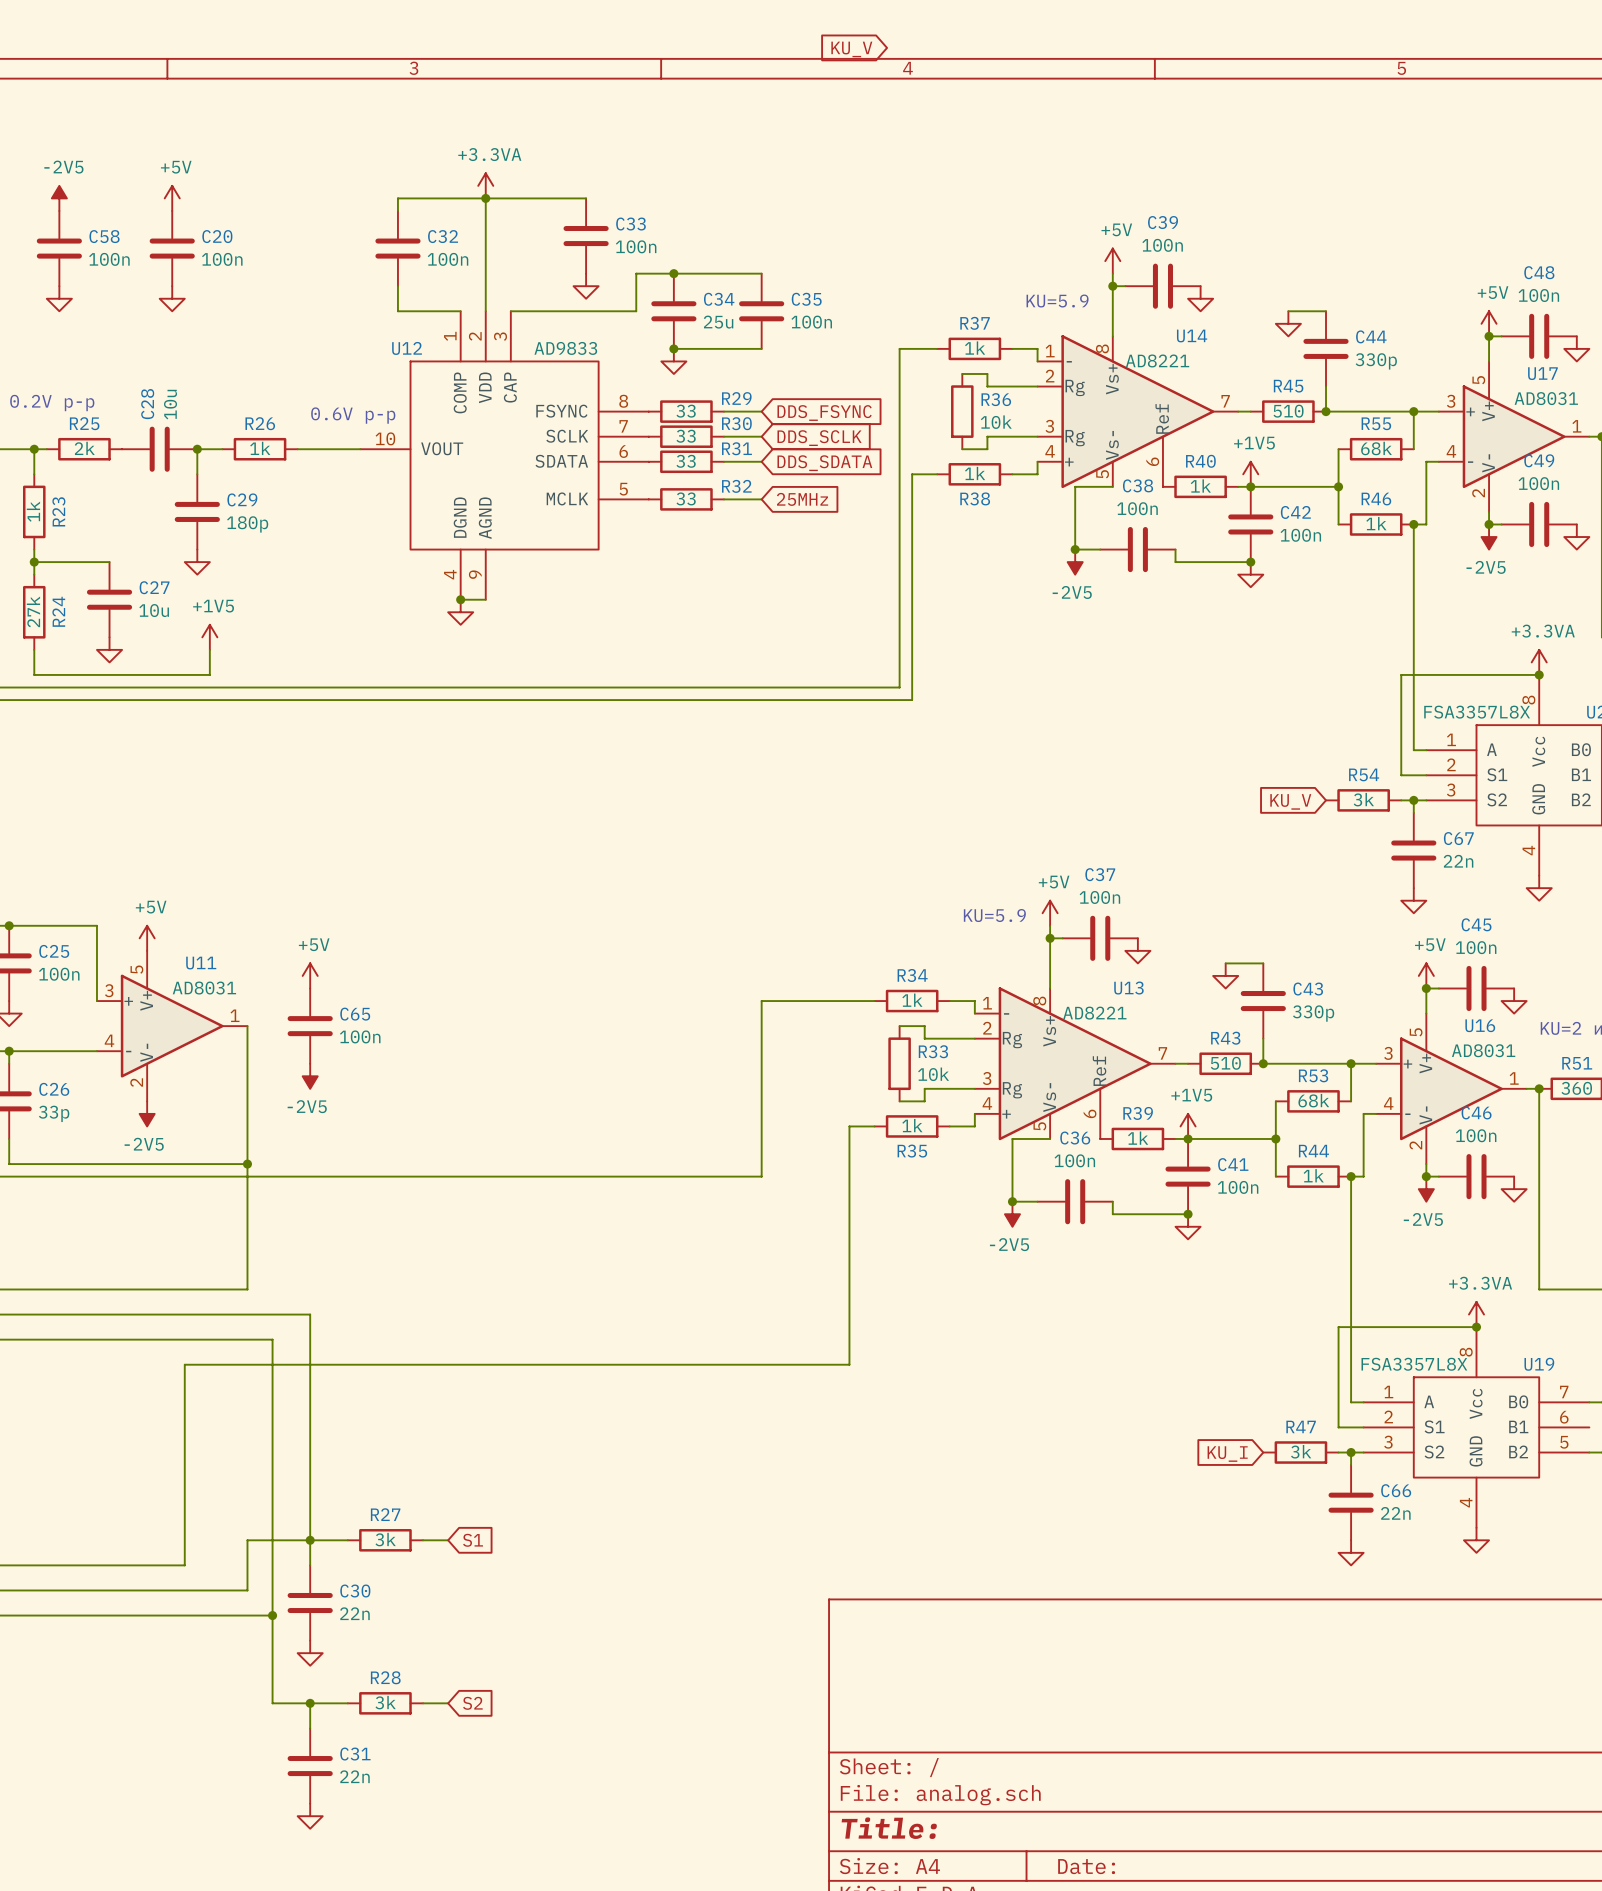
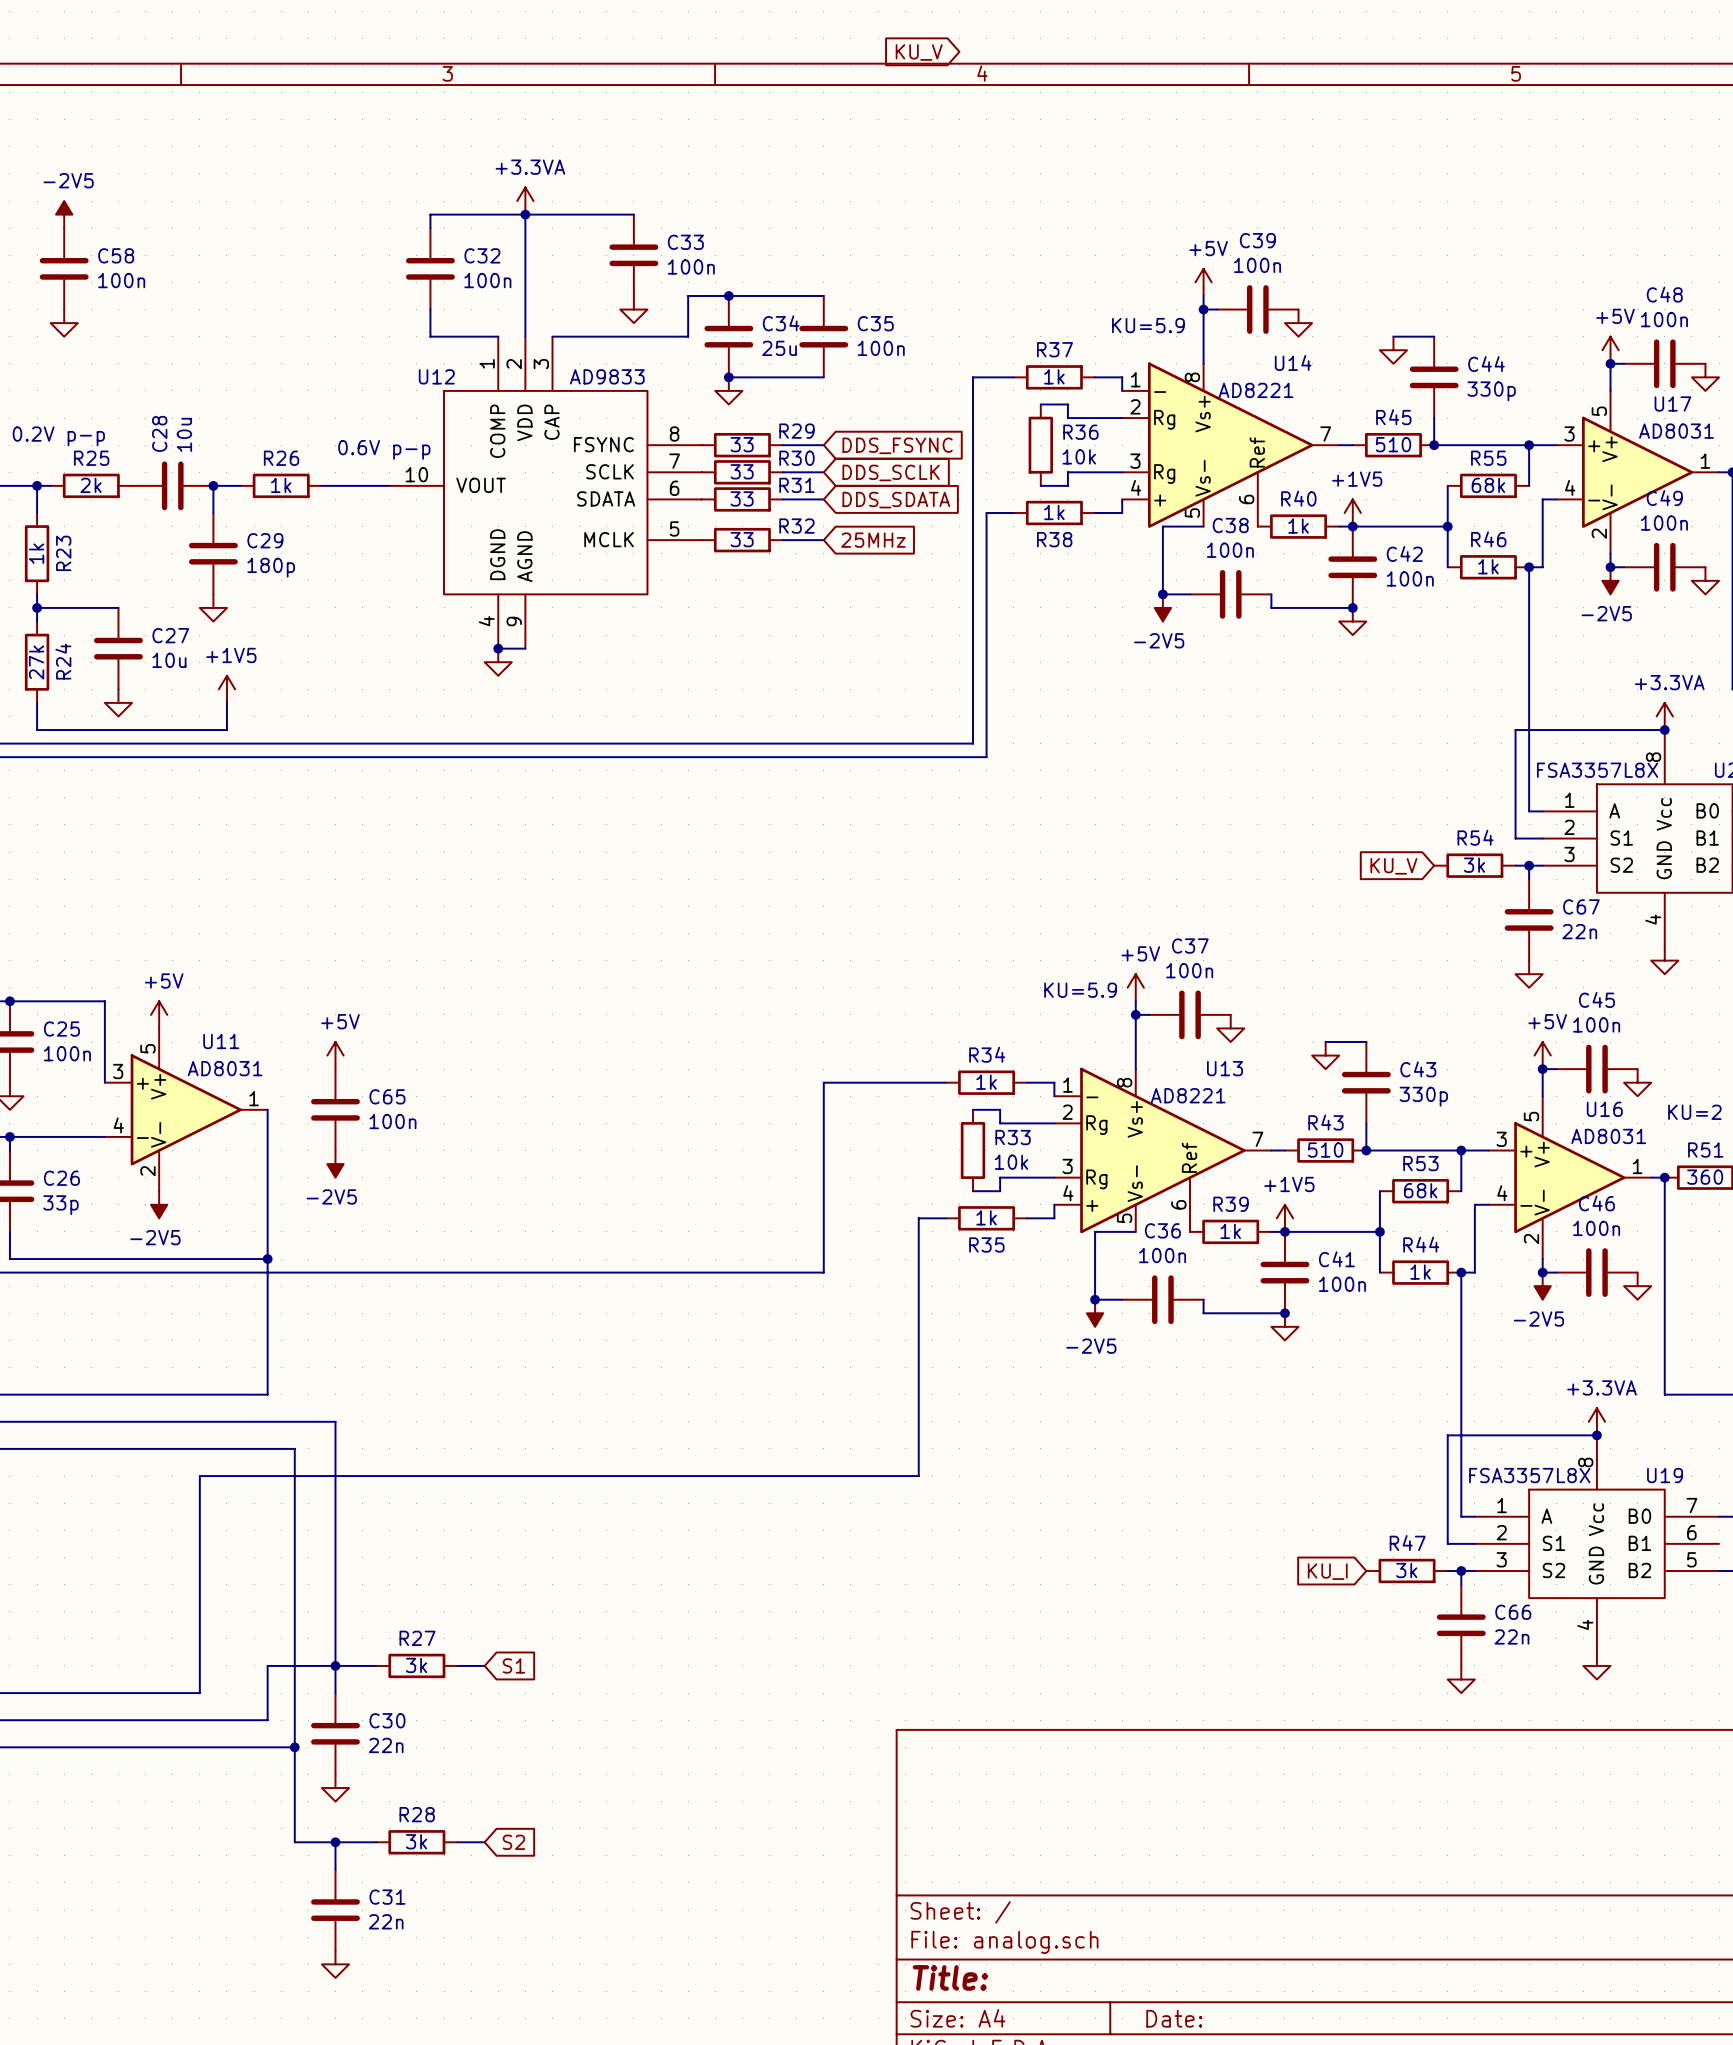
power symbol: +5V (172, 198) -> none
C20: 100n (172, 248) -> none
power symbol: (172, 298) -> none

